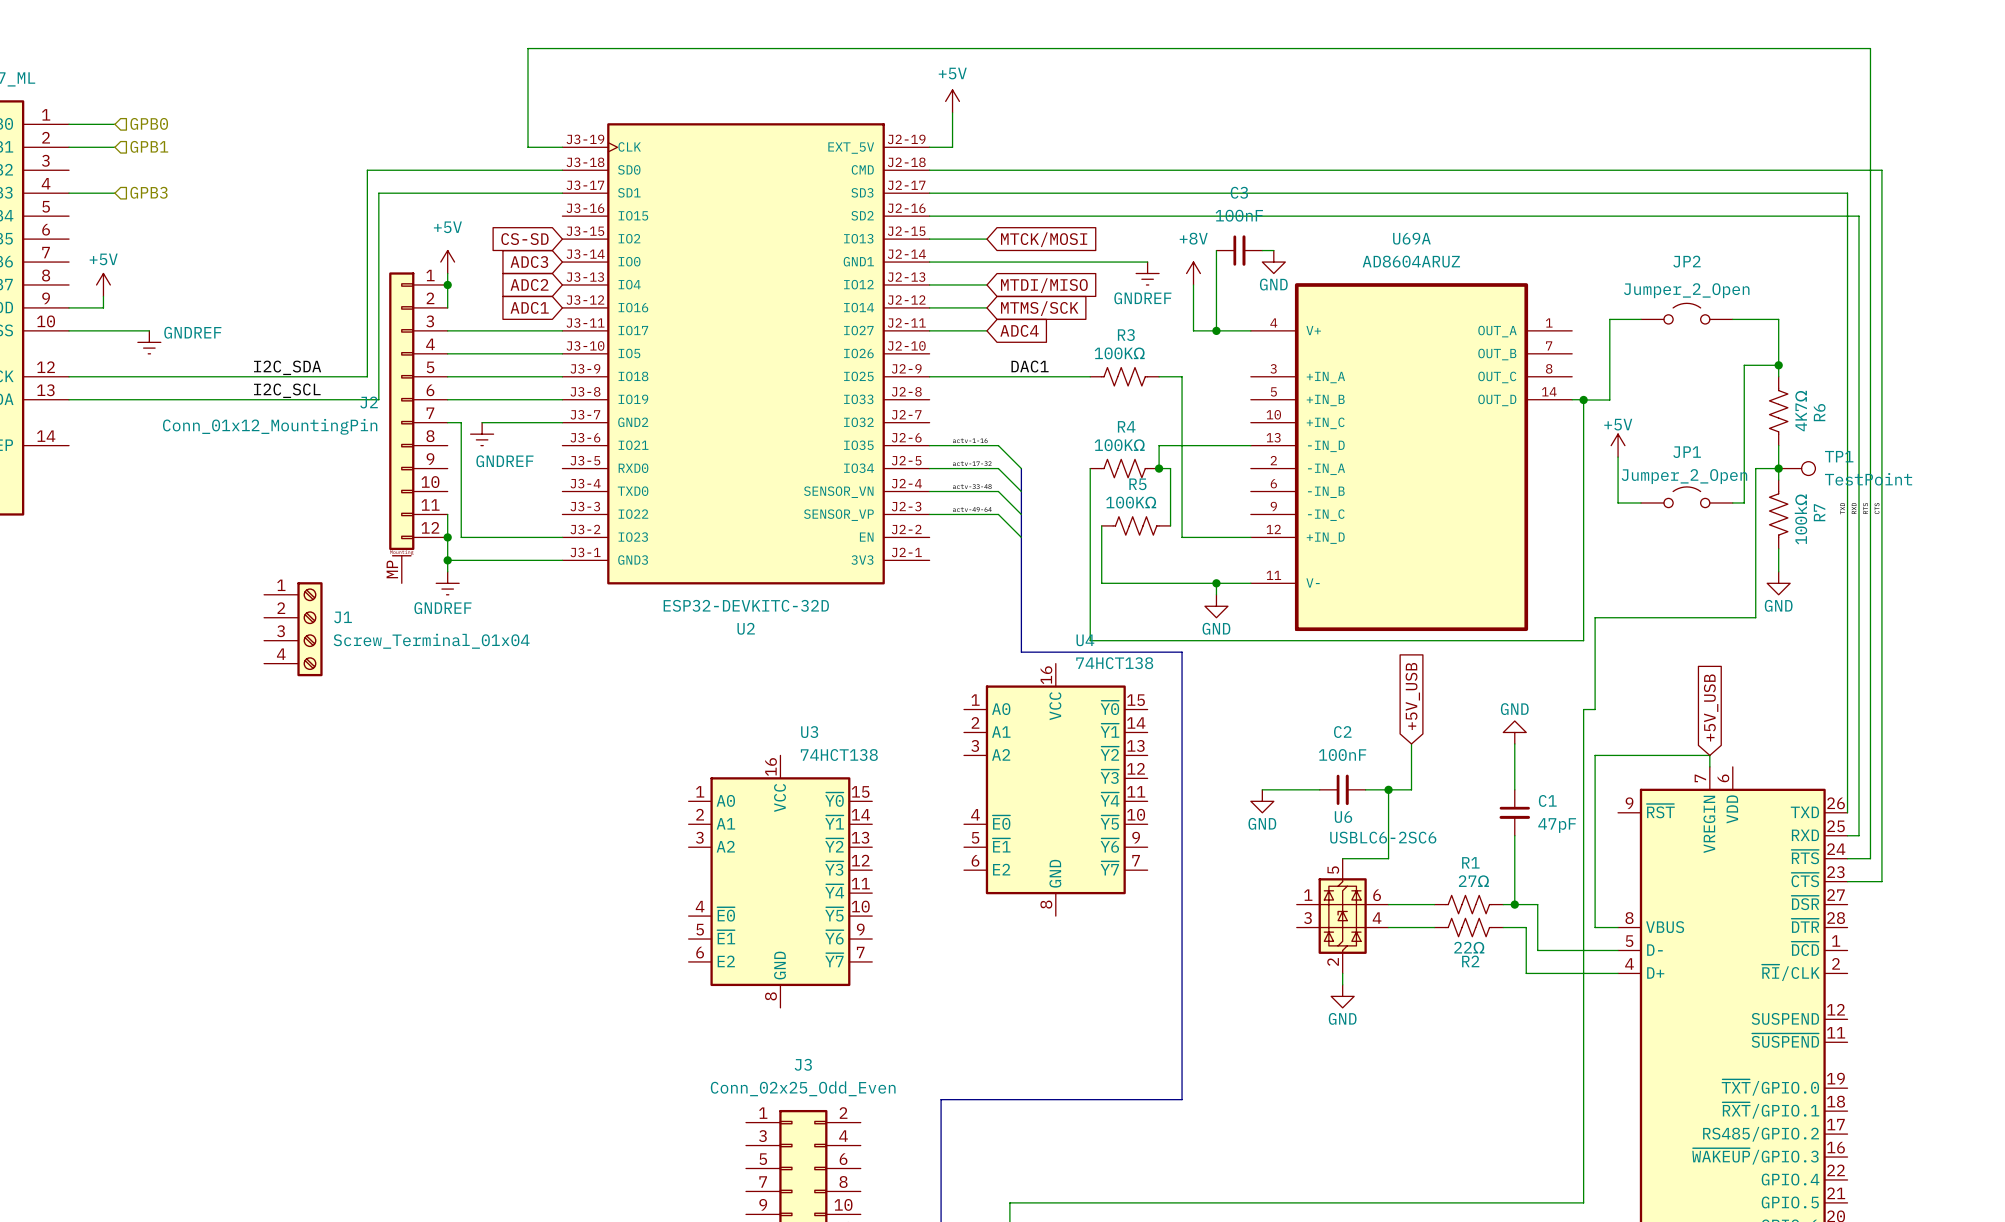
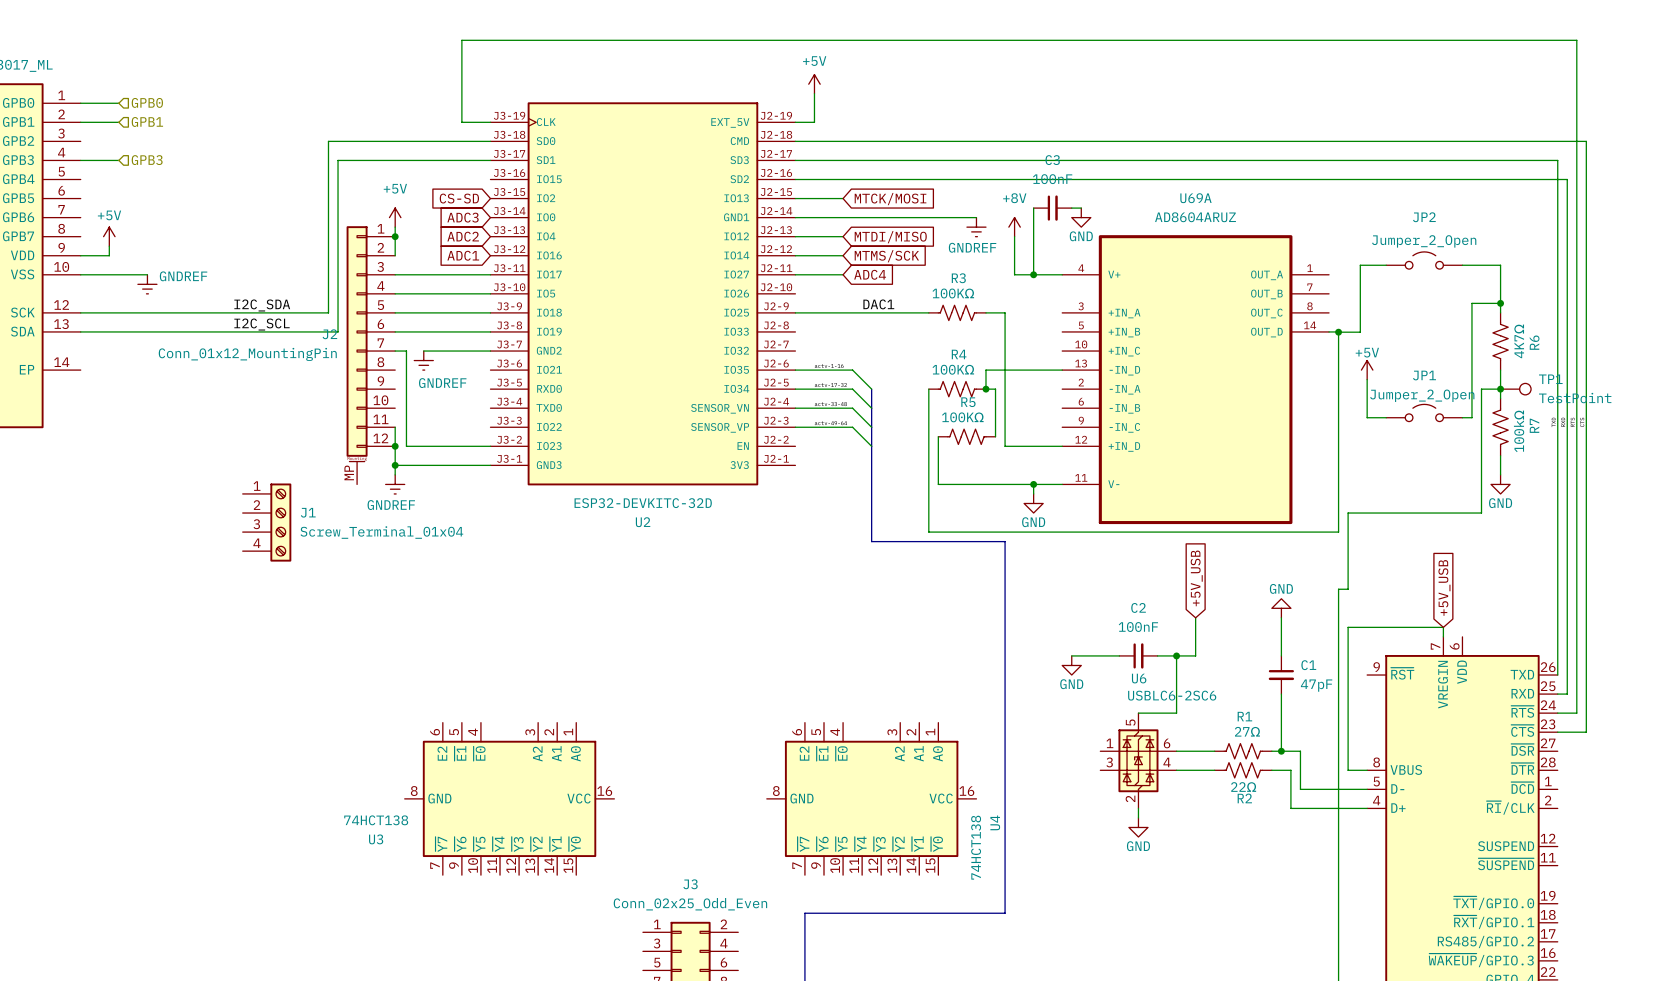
U3 name position: U3 (809, 732) -> U3 (376, 839)
U3 value position: 74HCT138 (839, 754) -> 74HCT138 (376, 820)
U4 rotation: 0° (1055, 789) -> 90° clockwise (871, 798)
U4 position: (1055, 789) -> (871, 798)
U3 rotation: 0° (780, 881) -> 90° clockwise (509, 798)
U3 position: (780, 881) -> (509, 798)

